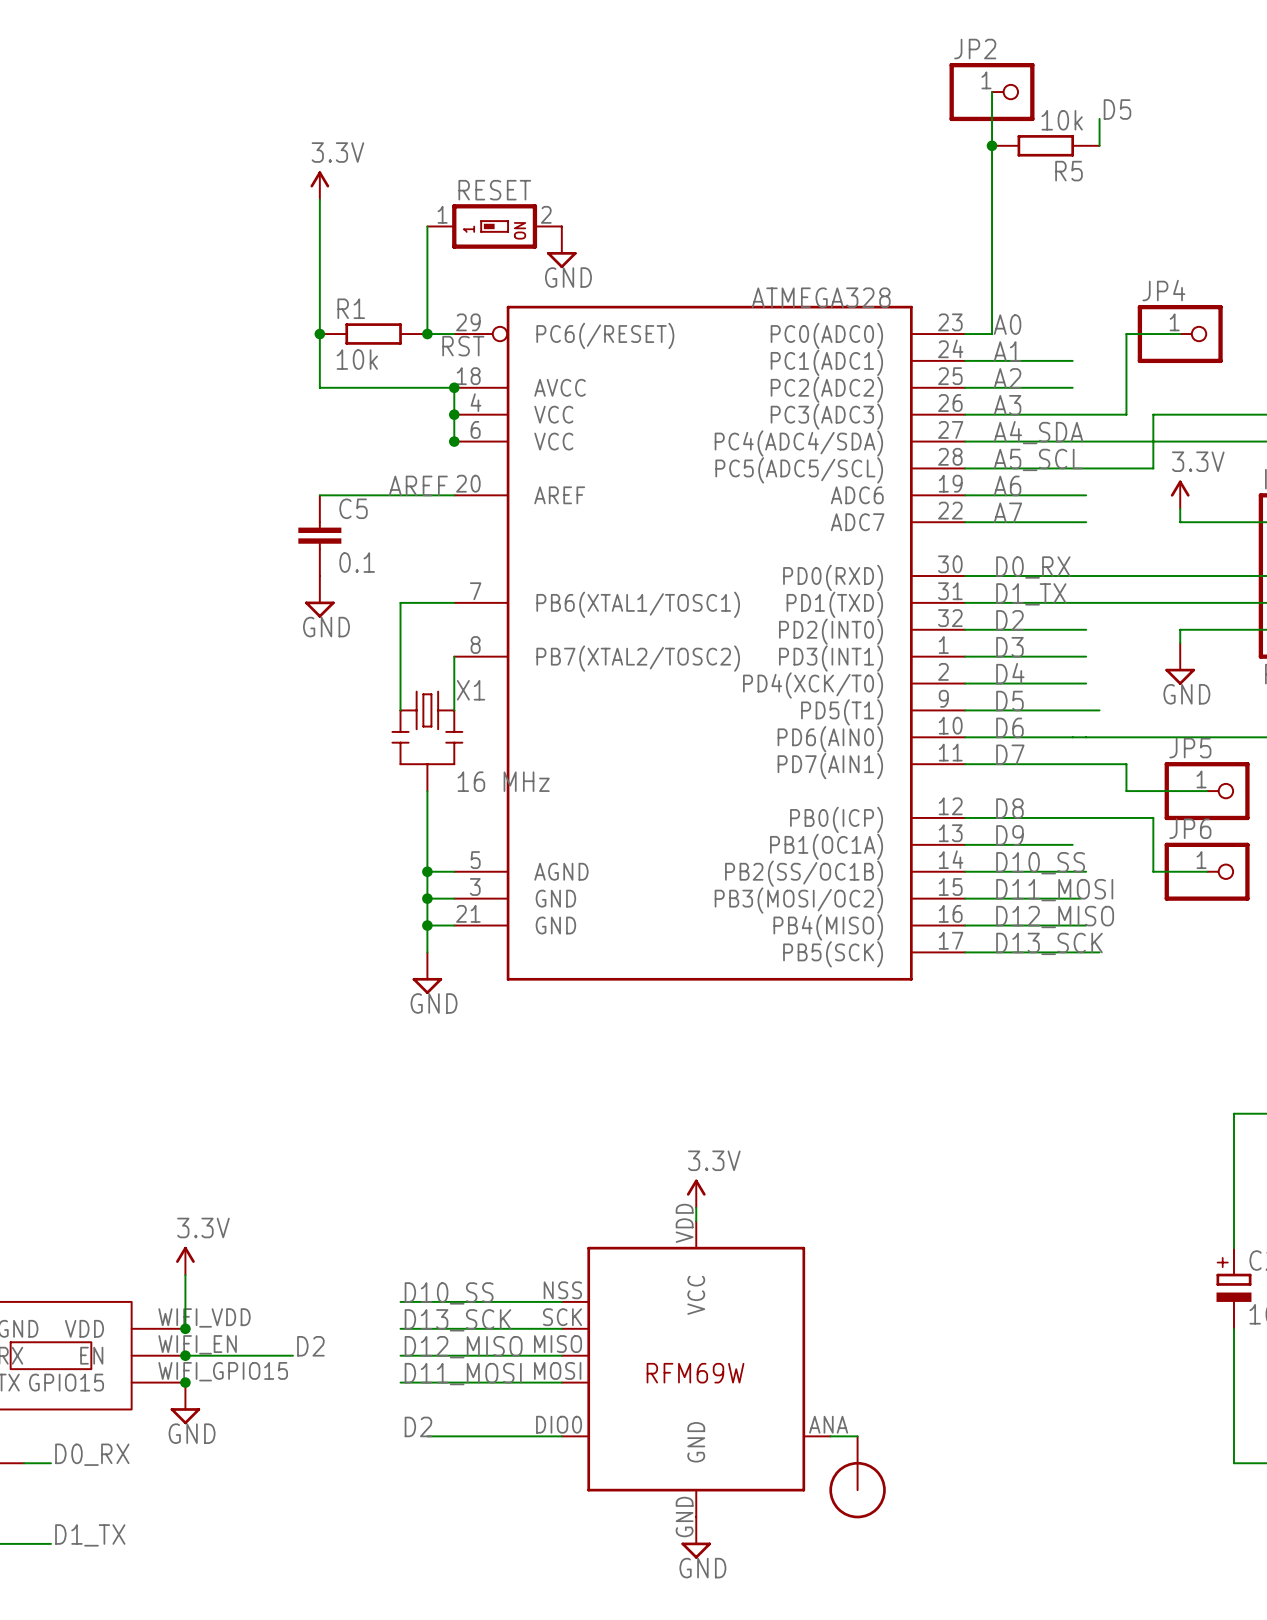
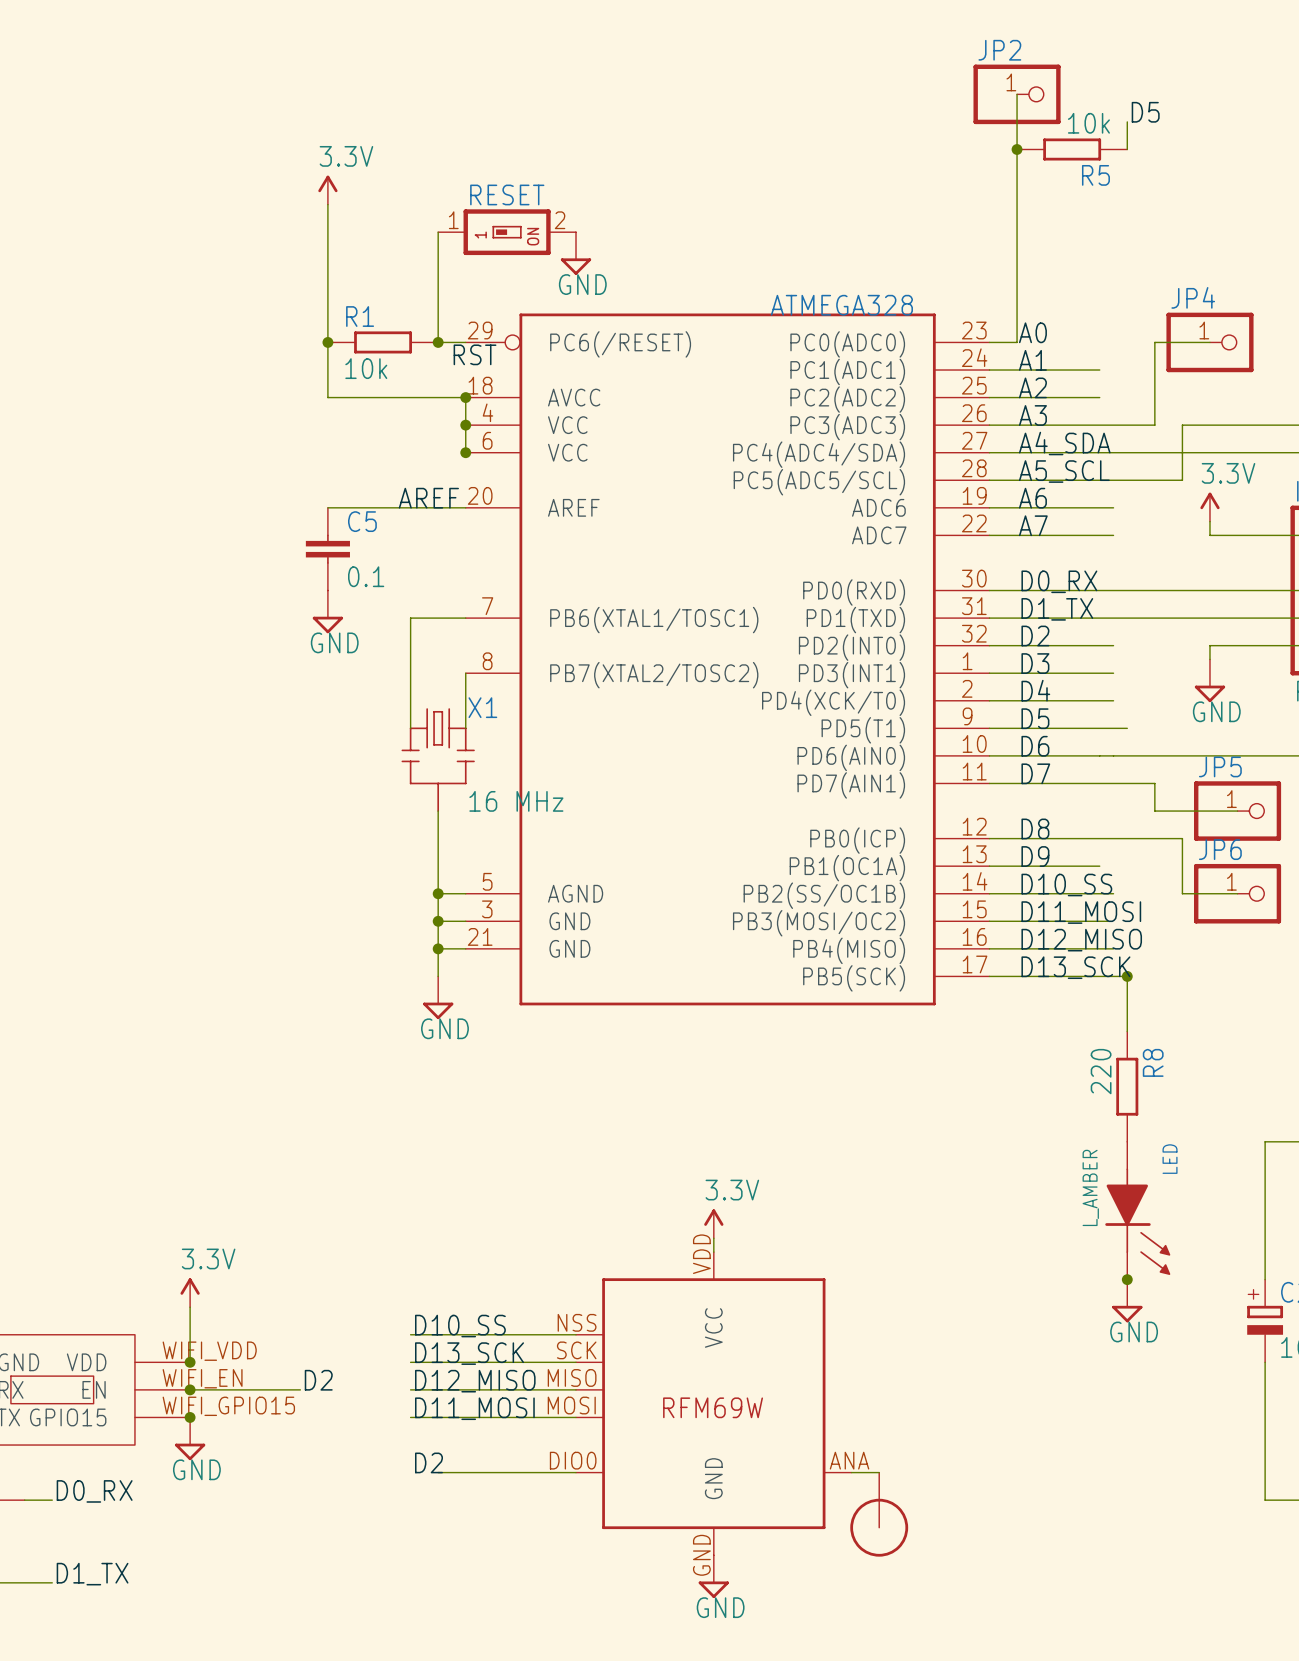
wire: none -> (1127, 976) (1127, 1031)
junction: none -> (1127, 976)
R8: none -> 220 (1127, 1086)
LED: none -> L_AMBER (1137, 1210)
junction: none -> (1127, 1279)
power symbol: none -> GND (1127, 1301)

